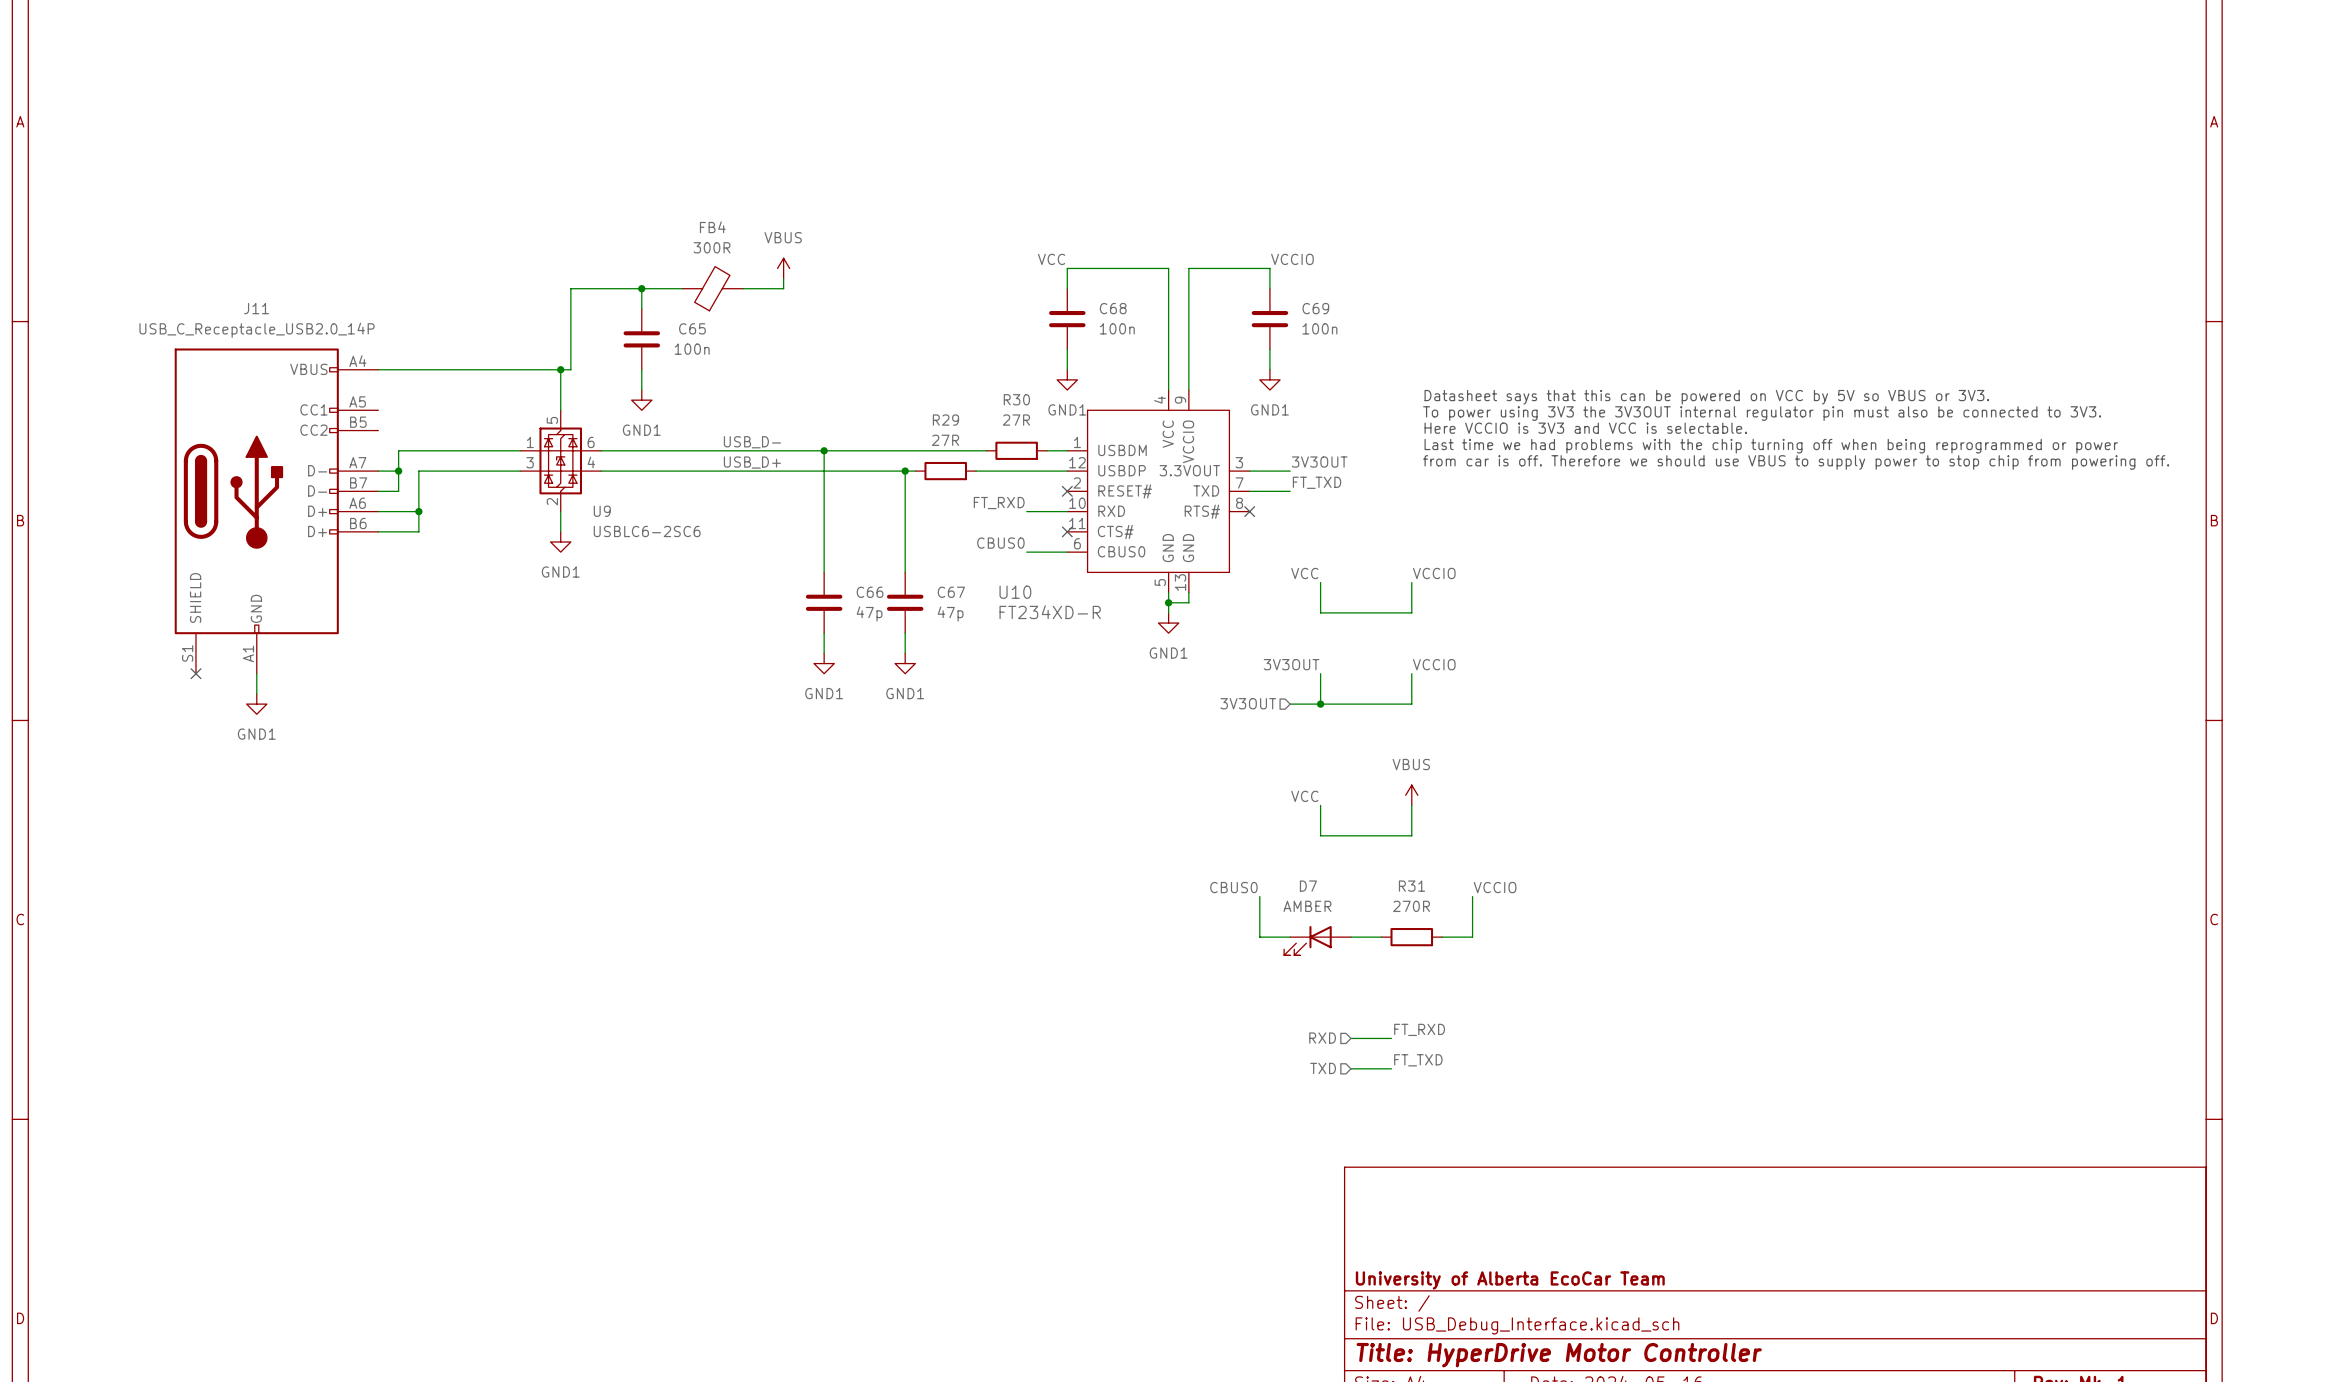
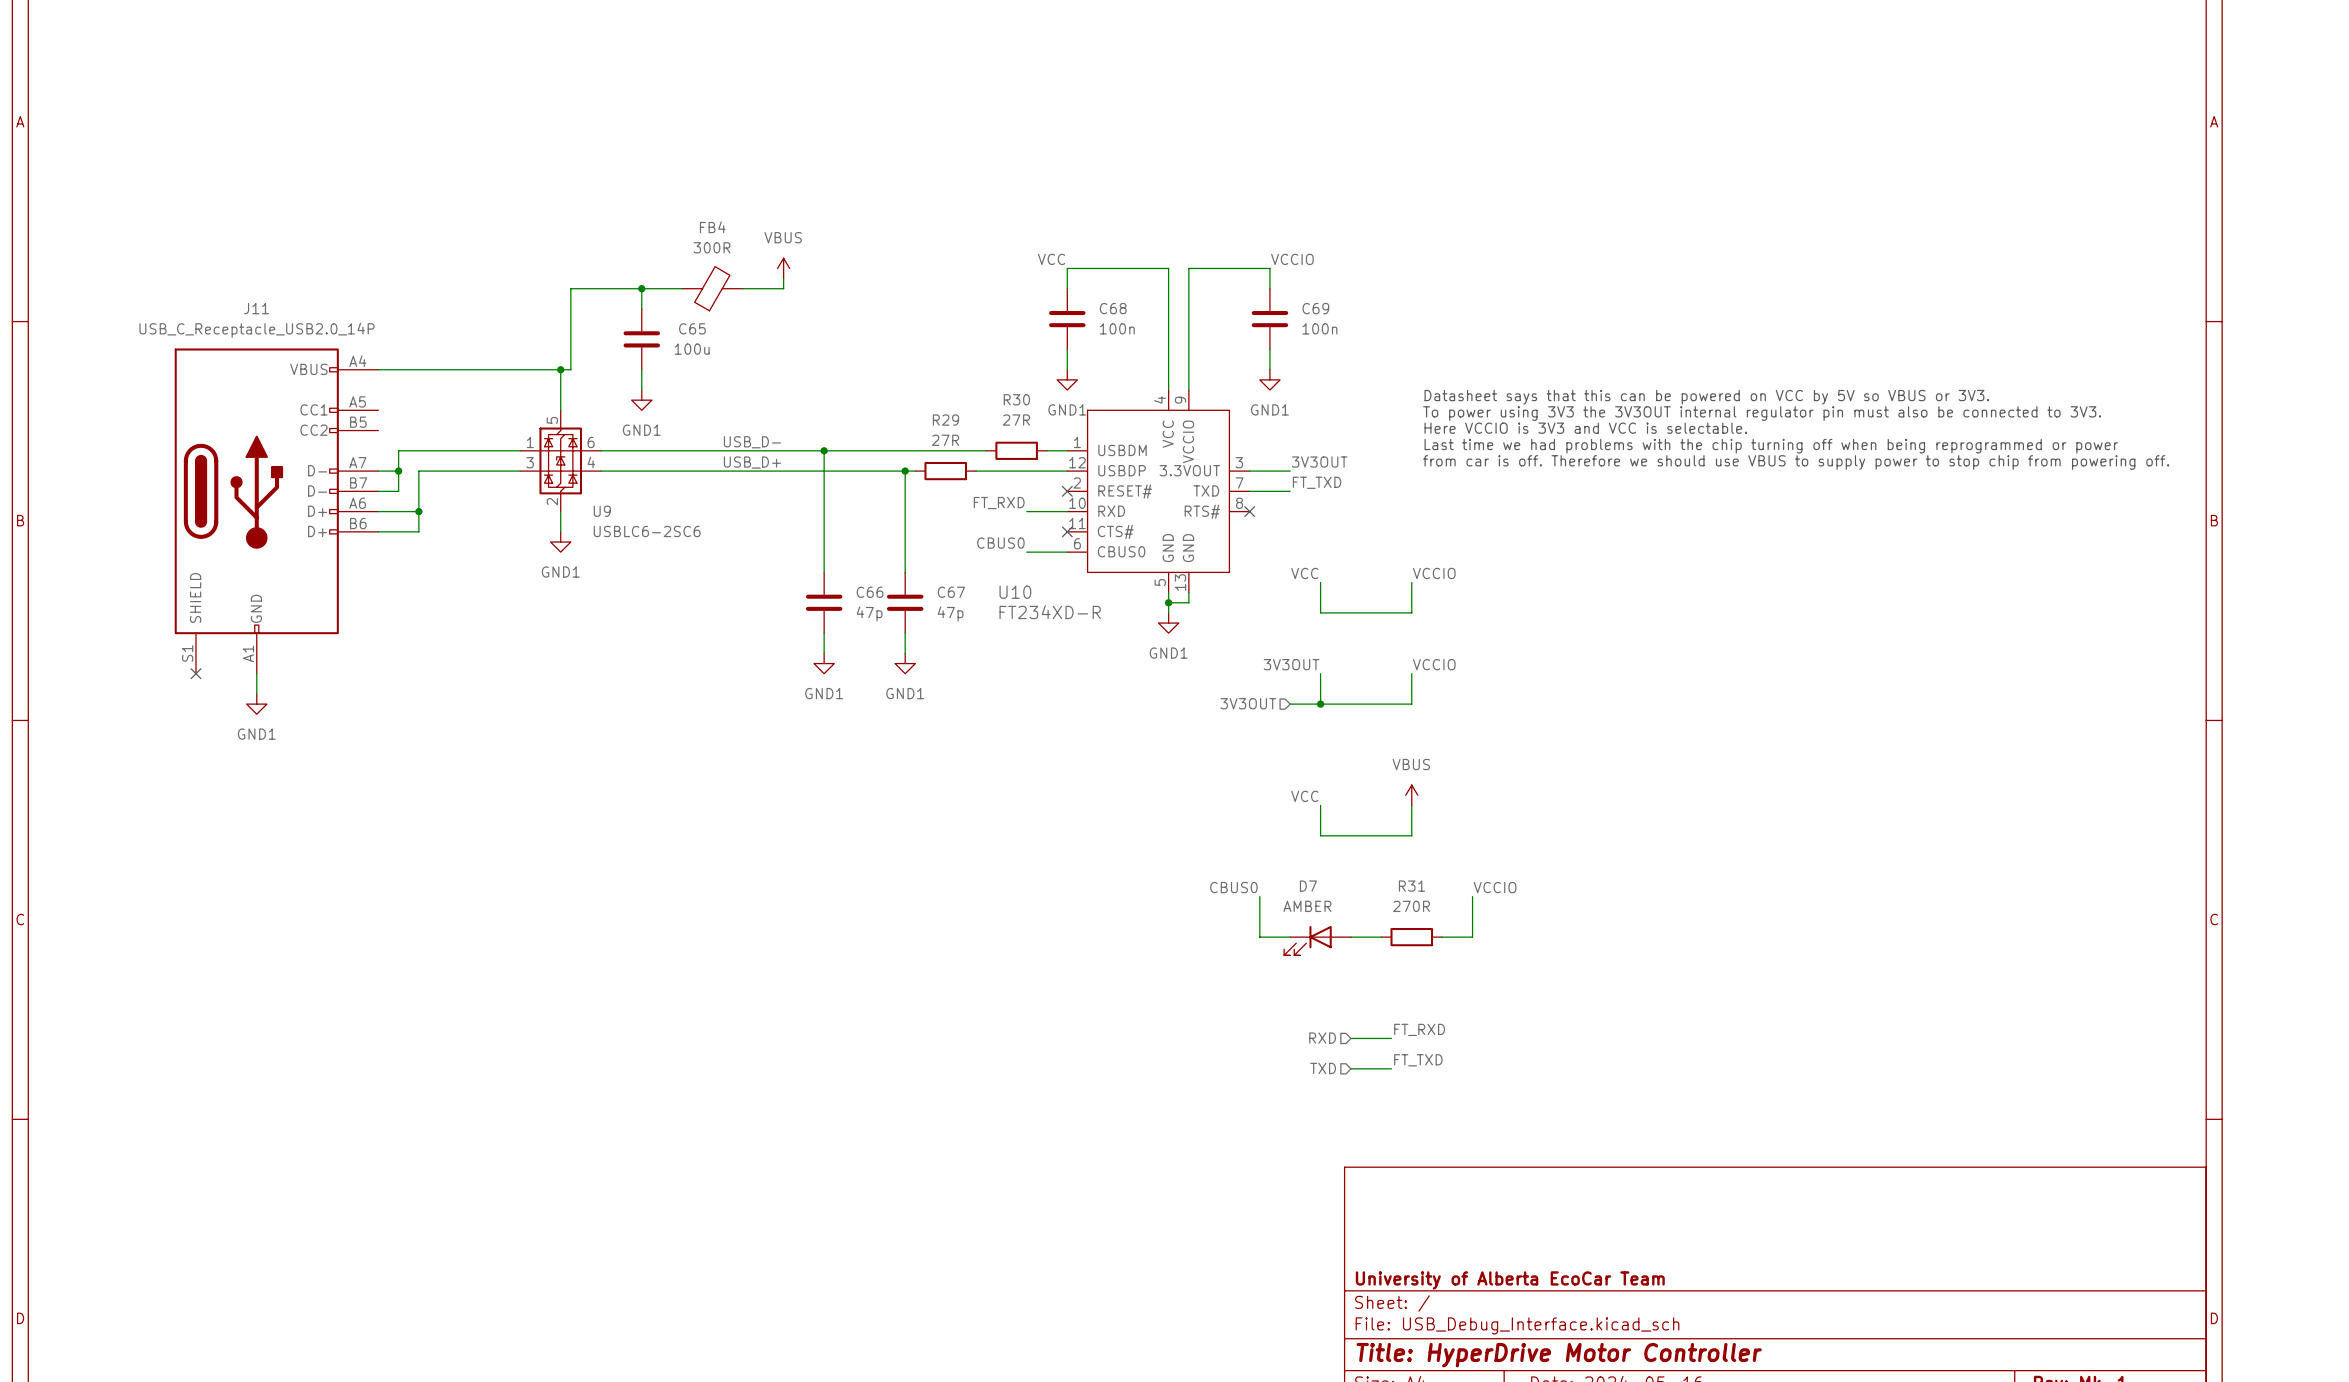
C65 value: 100n (692, 349) -> 100u (692, 349)

